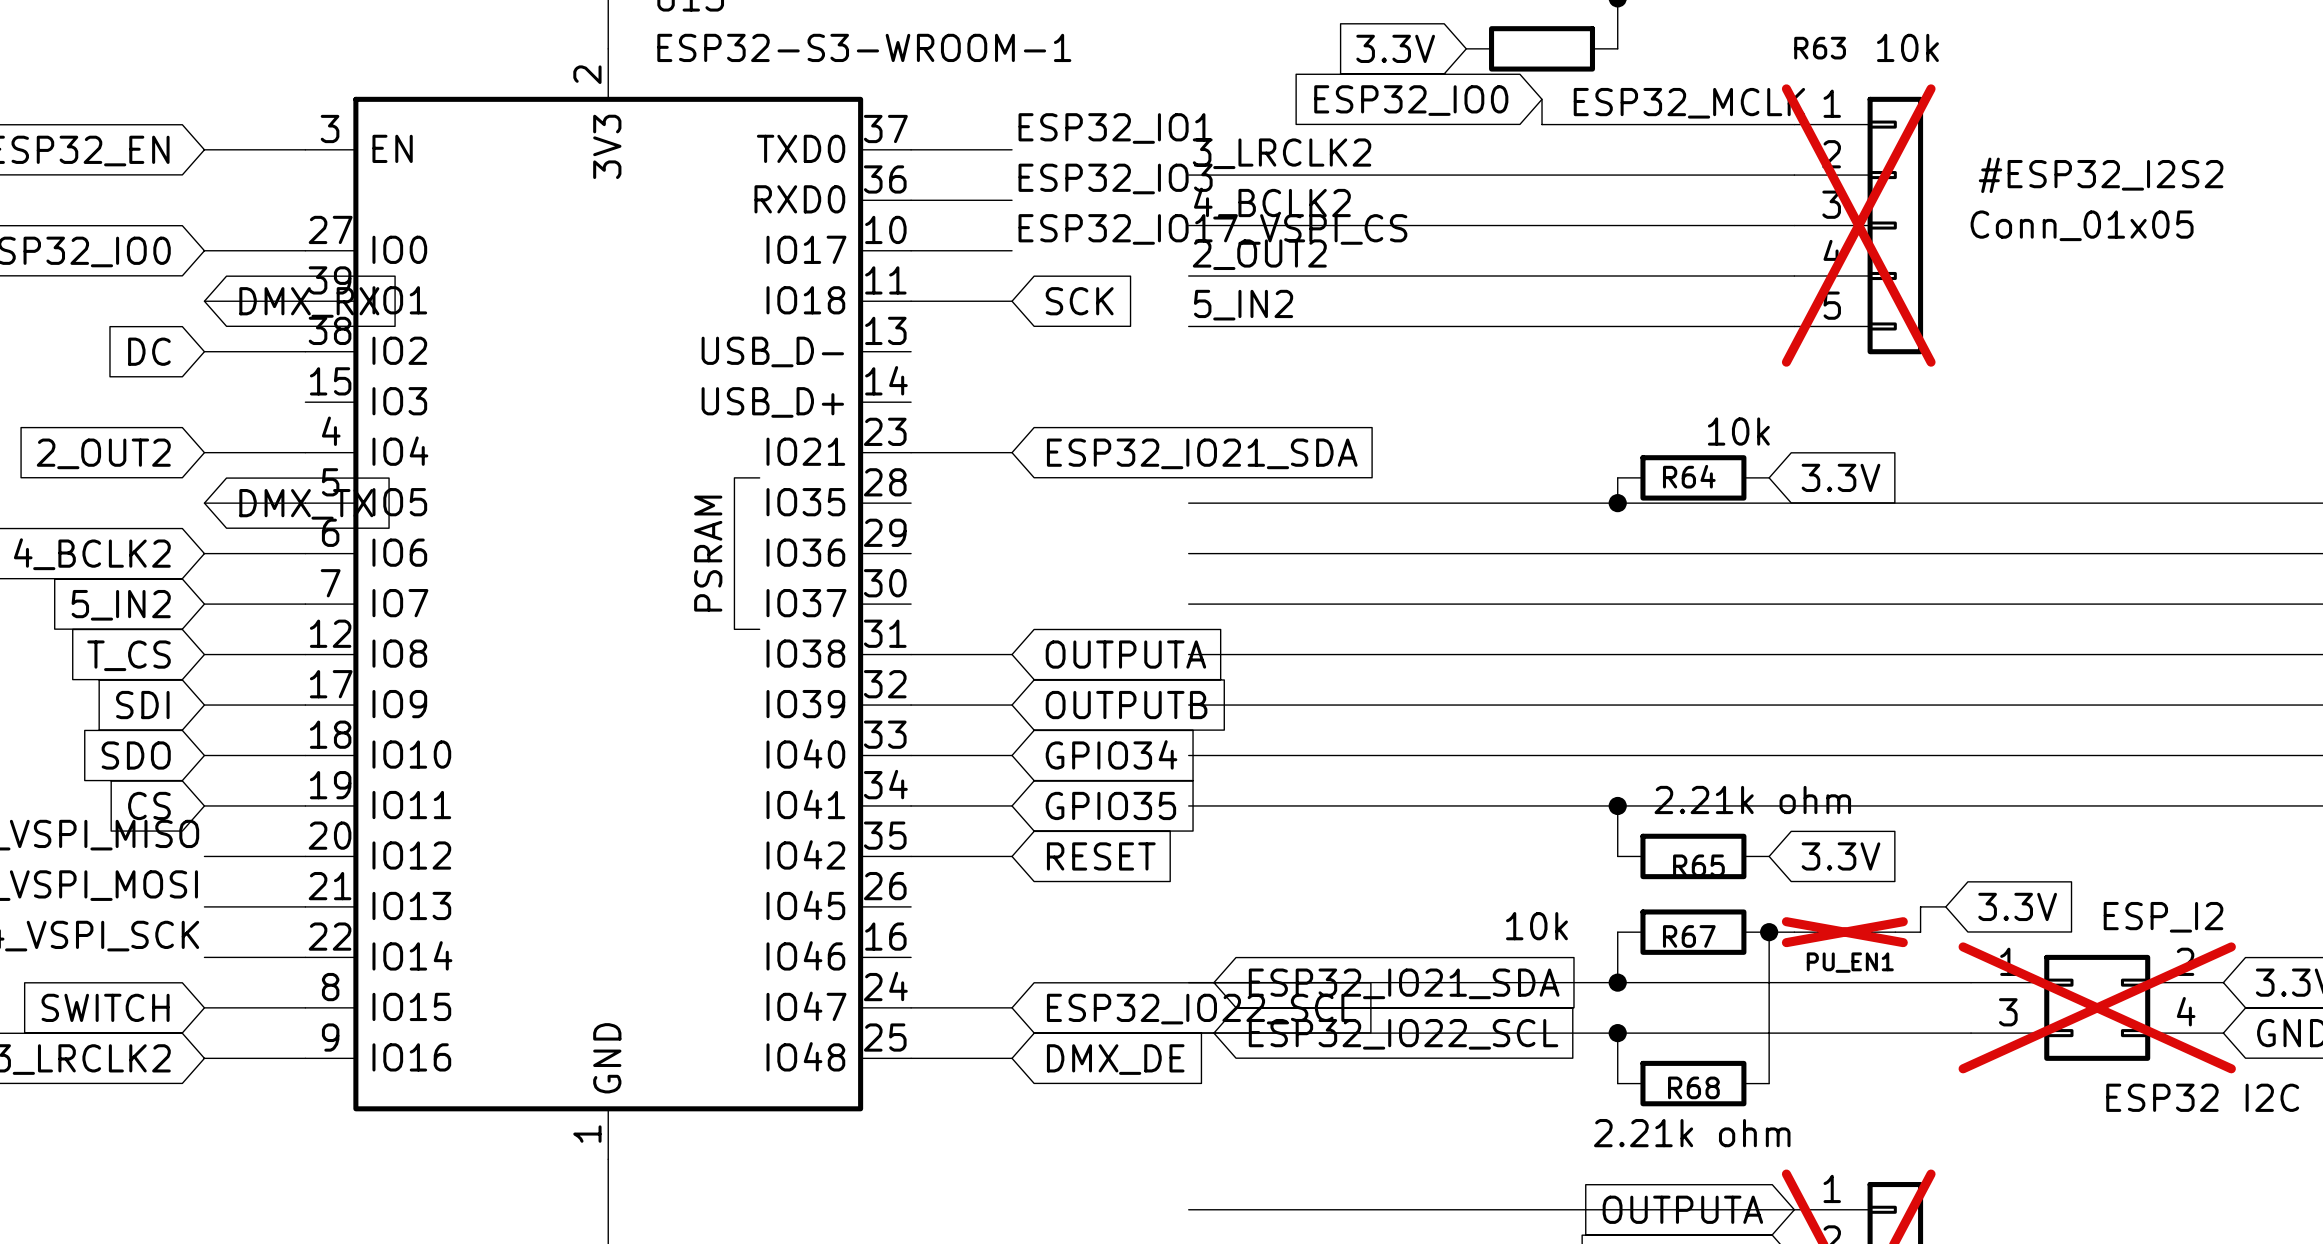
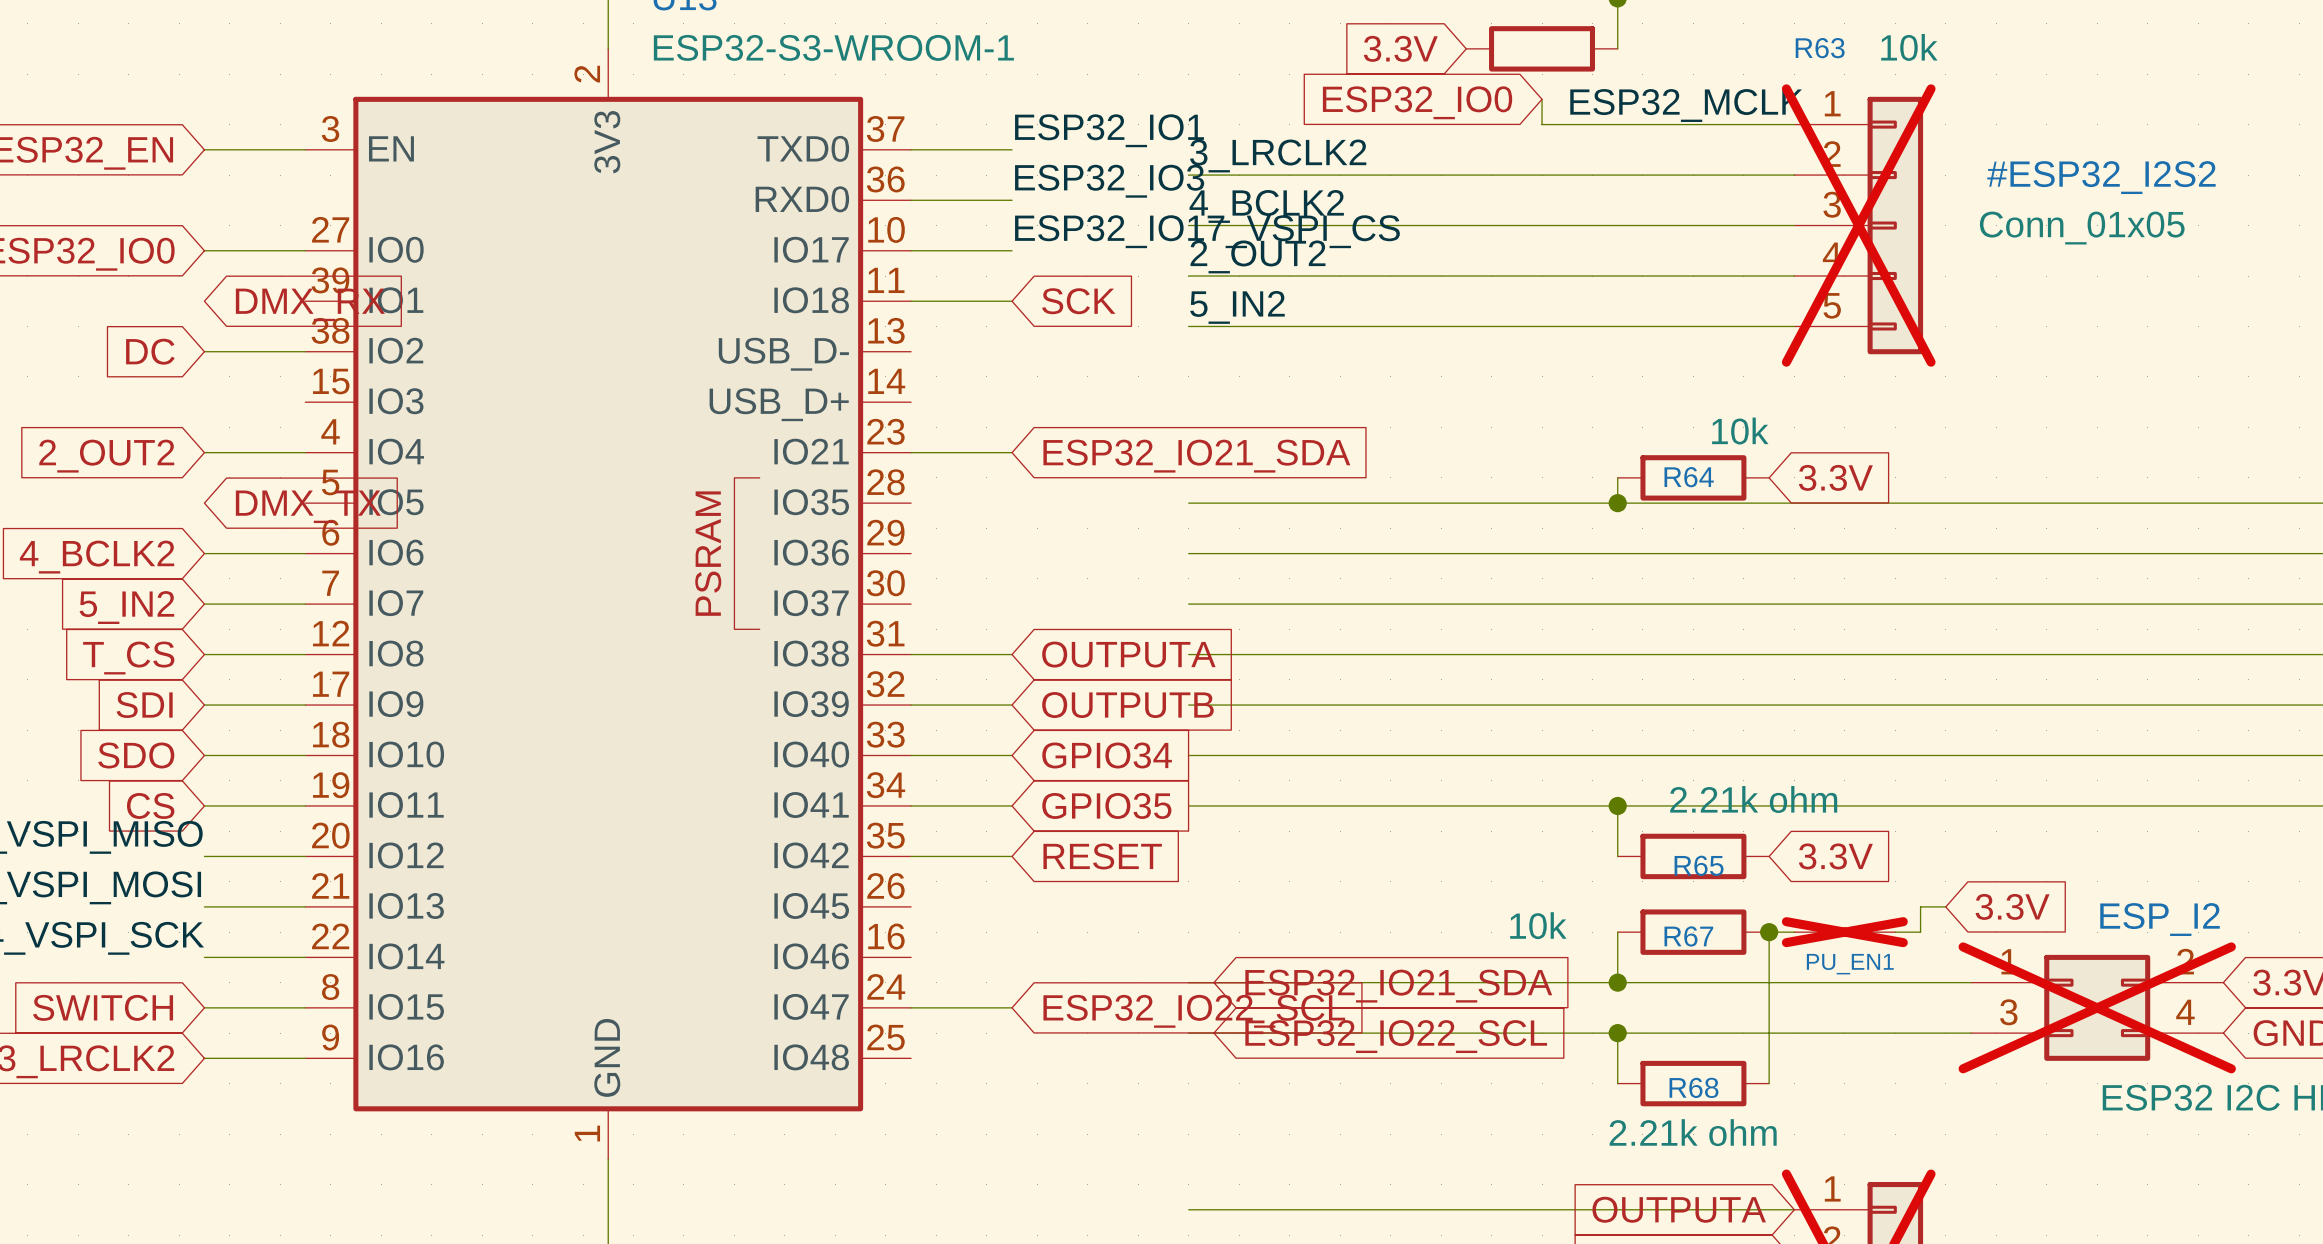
wire: (204, 301) (305, 301) -> none
wire: (204, 503) (305, 503) -> none
wire: (911, 1058) (1012, 1058) -> none
global label: DMX_DE (1115, 1059) -> none

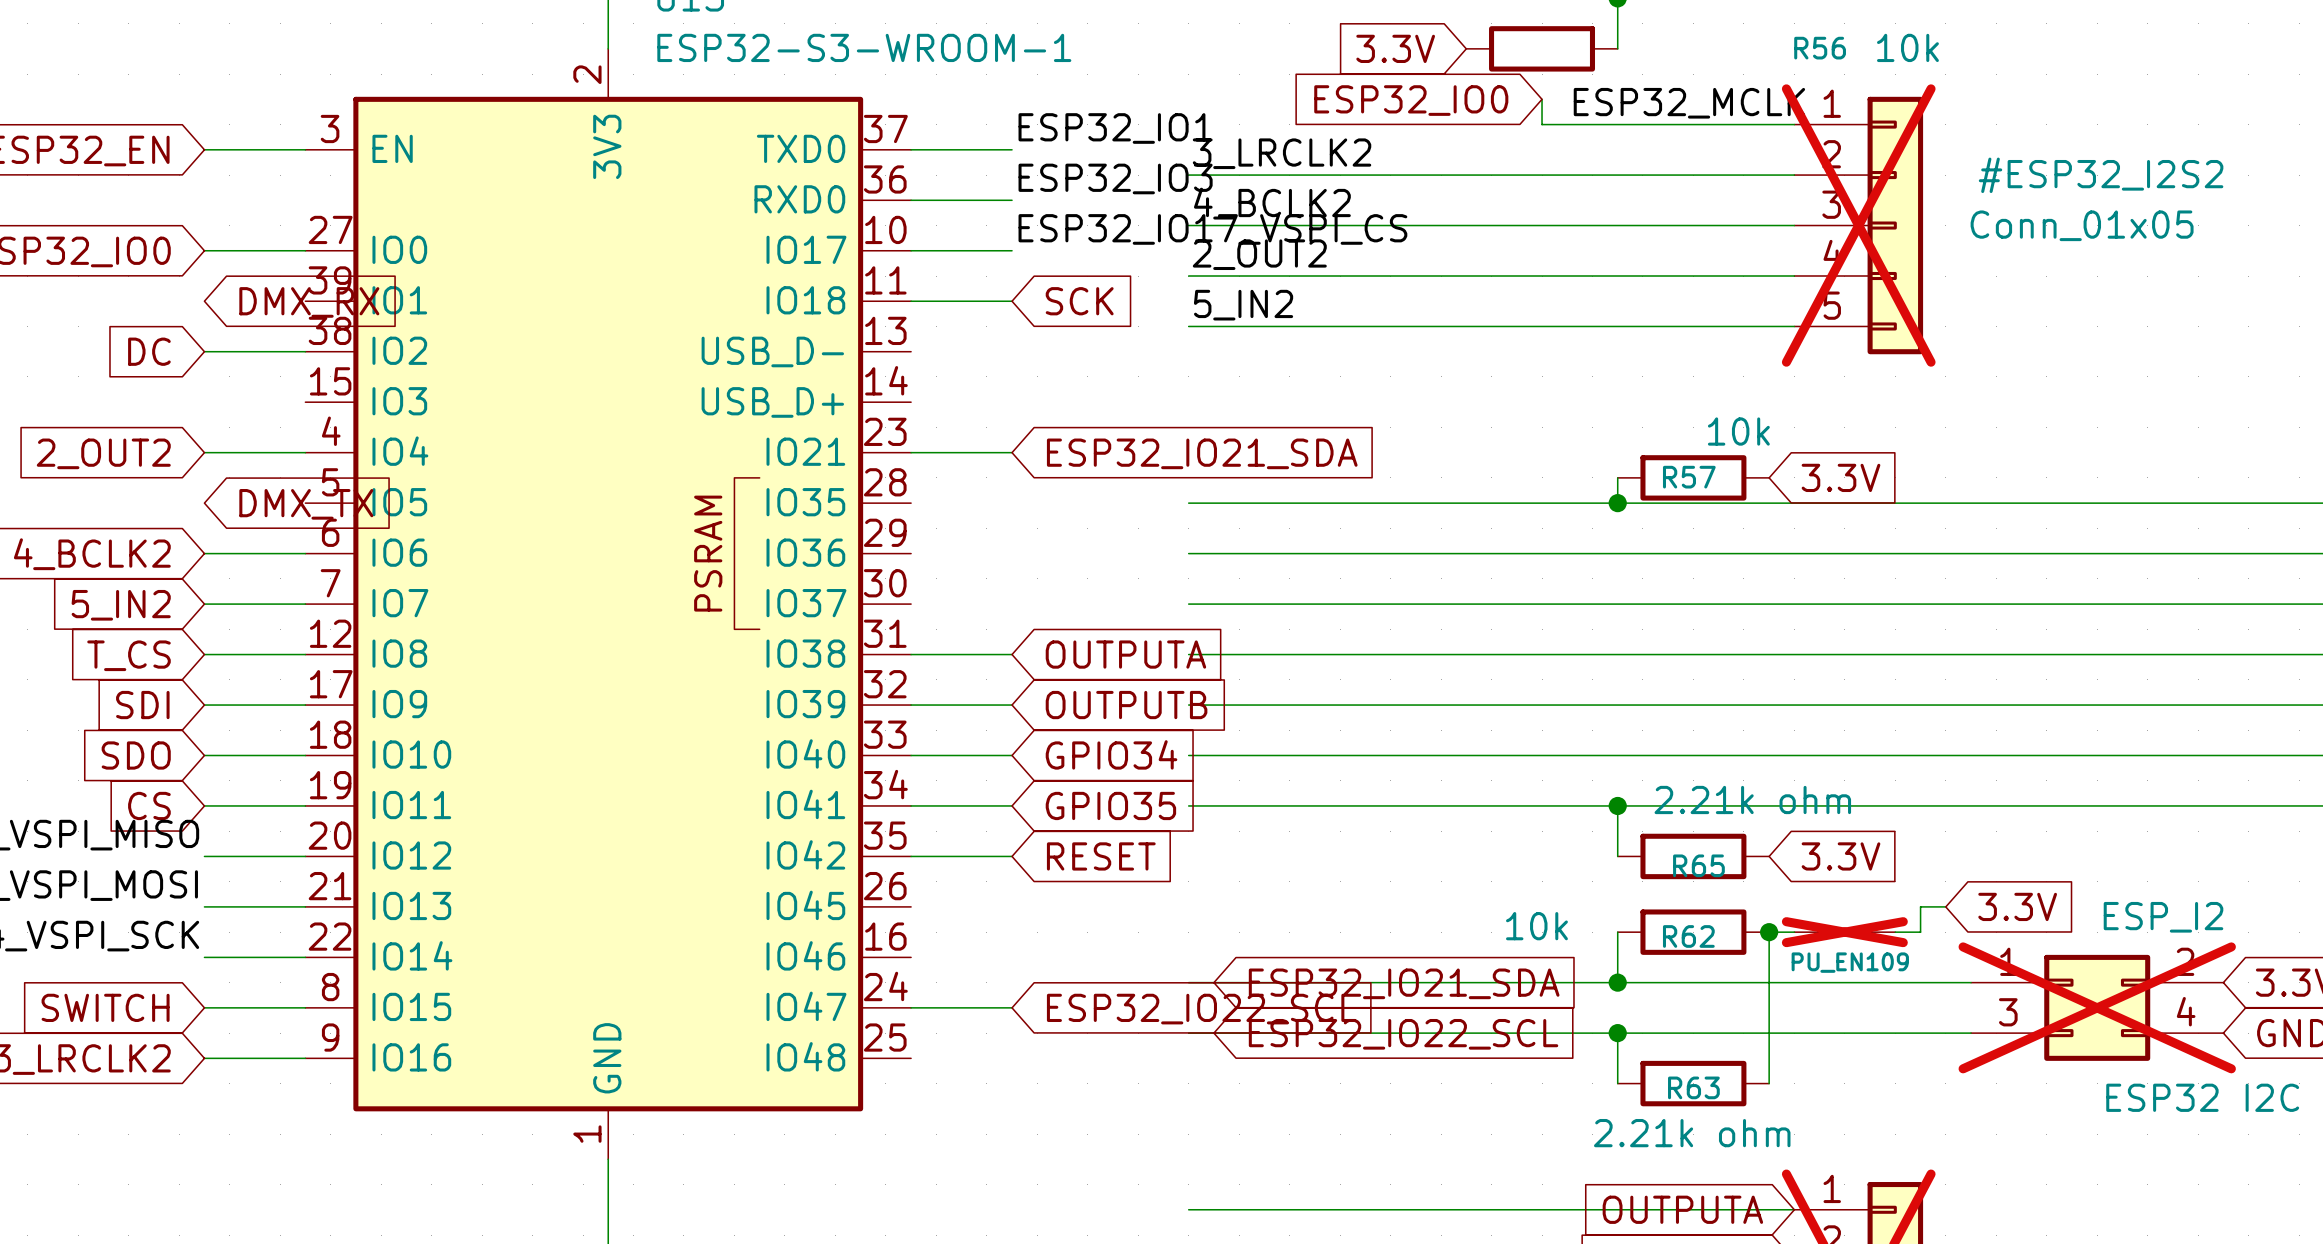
R63 name: R63 (1820, 48) -> R56 (1820, 48)
R64 name: R64 (1689, 477) -> R57 (1689, 477)
R67 name: R67 (1688, 936) -> R62 (1688, 936)
PU_EN1 name: PU_EN1 (1850, 964) -> PU_EN109 (1850, 962)
R68 name: R68 (1693, 1087) -> R63 (1693, 1087)

